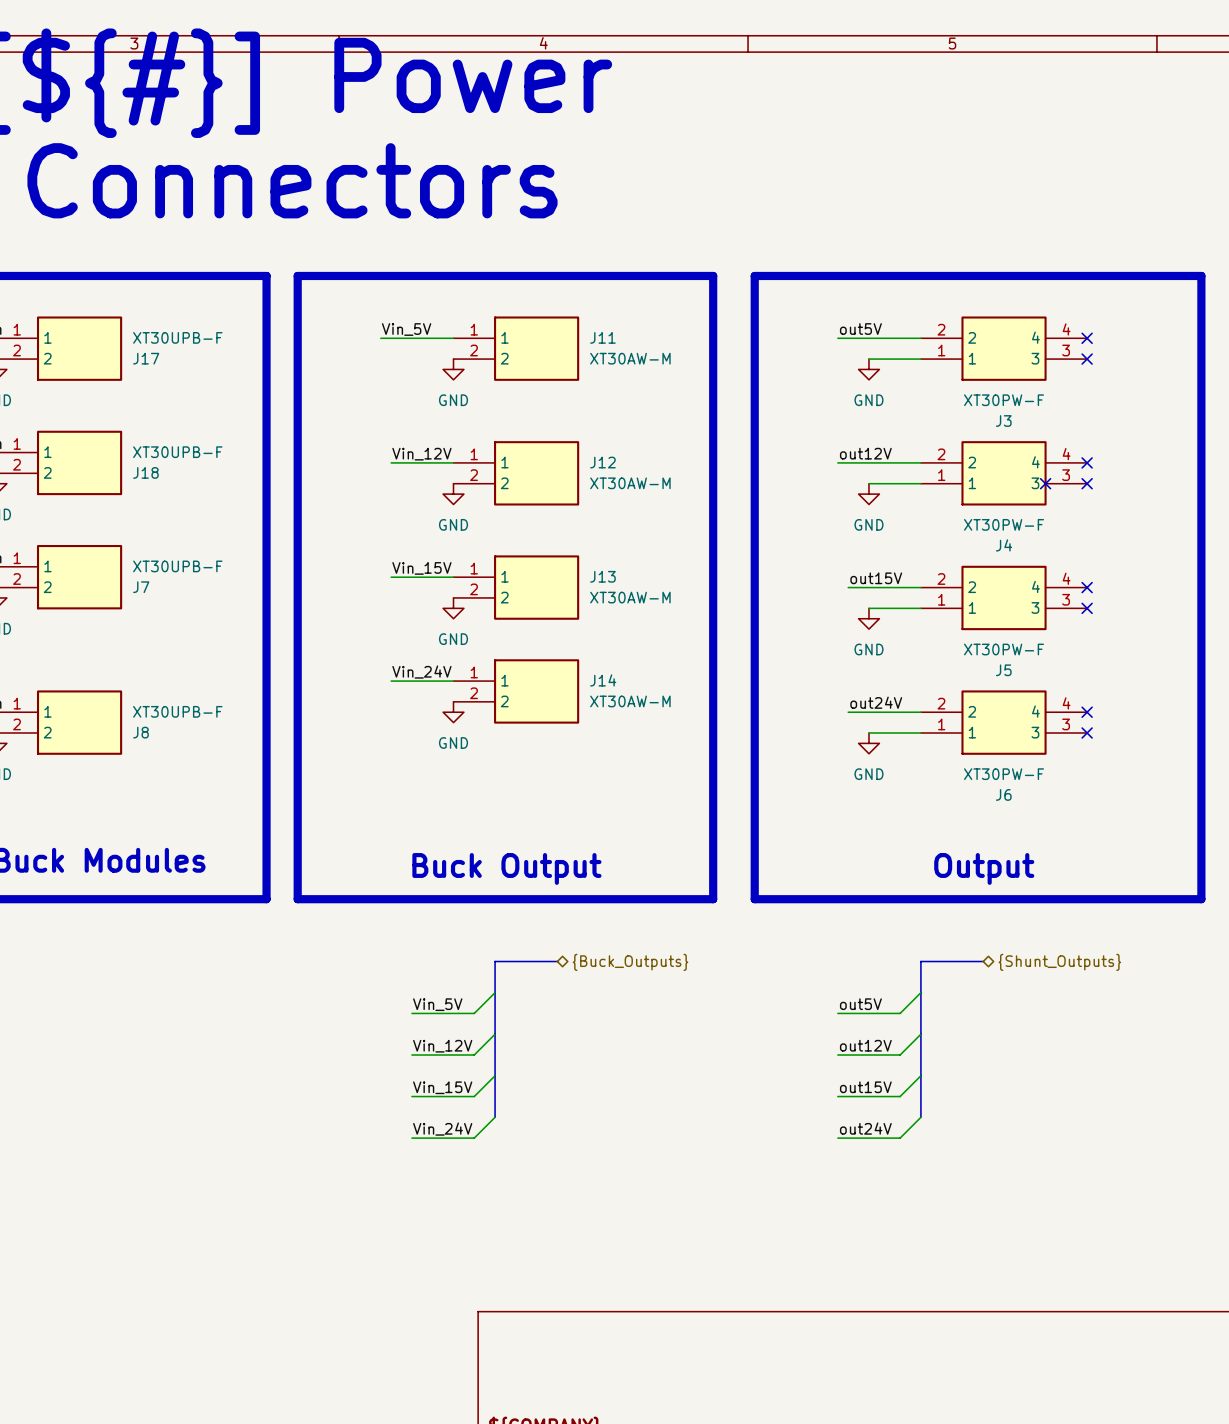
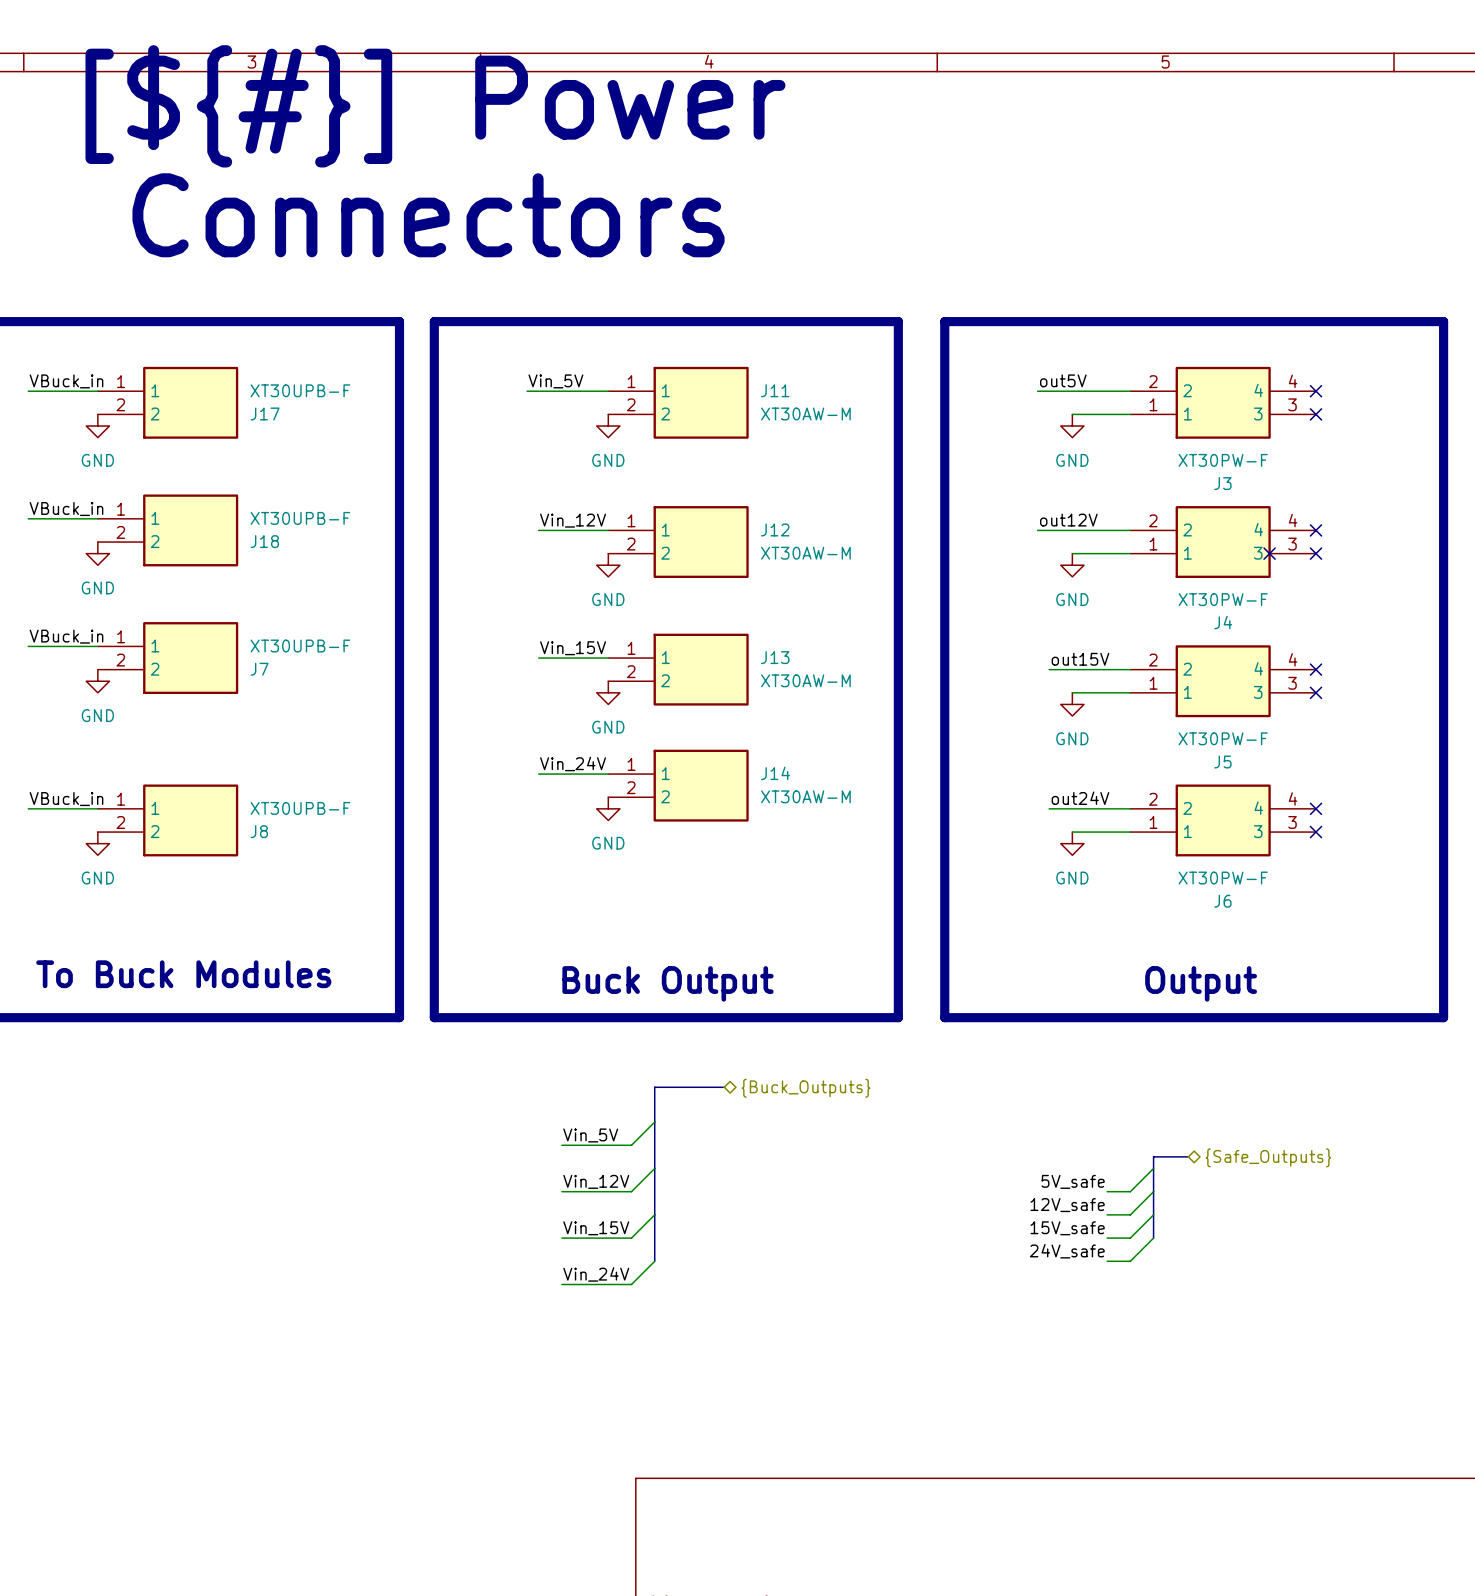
bus: (983, 961) (920, 961) (920, 1117) -> none
hierarchical label: {Shunt_Outputs} (1059, 962) -> none
wire: (920, 992) (900, 1013) (837, 1013) -> none
label: out5V (860, 1004) -> none
bus: none -> (1188, 1156) (1153, 1156) (1153, 1238)
hierarchical label: none -> {Safe_Outputs} (1268, 1157)
wire: (920, 1034) (900, 1055) (837, 1055) -> none
wire: none -> (1153, 1168) (1130, 1191) (1107, 1191)
label: out12V (865, 1045) -> none
label: none -> 5V_safe (1073, 1181)
wire: none -> (1153, 1191) (1130, 1214) (1107, 1214)
label: none -> 12V_safe (1067, 1205)
wire: (920, 1075) (900, 1096) (837, 1096) -> none
wire: none -> (1153, 1214) (1130, 1238) (1107, 1238)
label: none -> 15V_safe (1067, 1228)
label: out15V (865, 1087) -> none
wire: none -> (1153, 1238) (1130, 1261) (1107, 1261)
label: none -> 24V_safe (1067, 1251)
wire: (920, 1117) (900, 1138) (837, 1138) -> none
label: out24V (865, 1128) -> none

